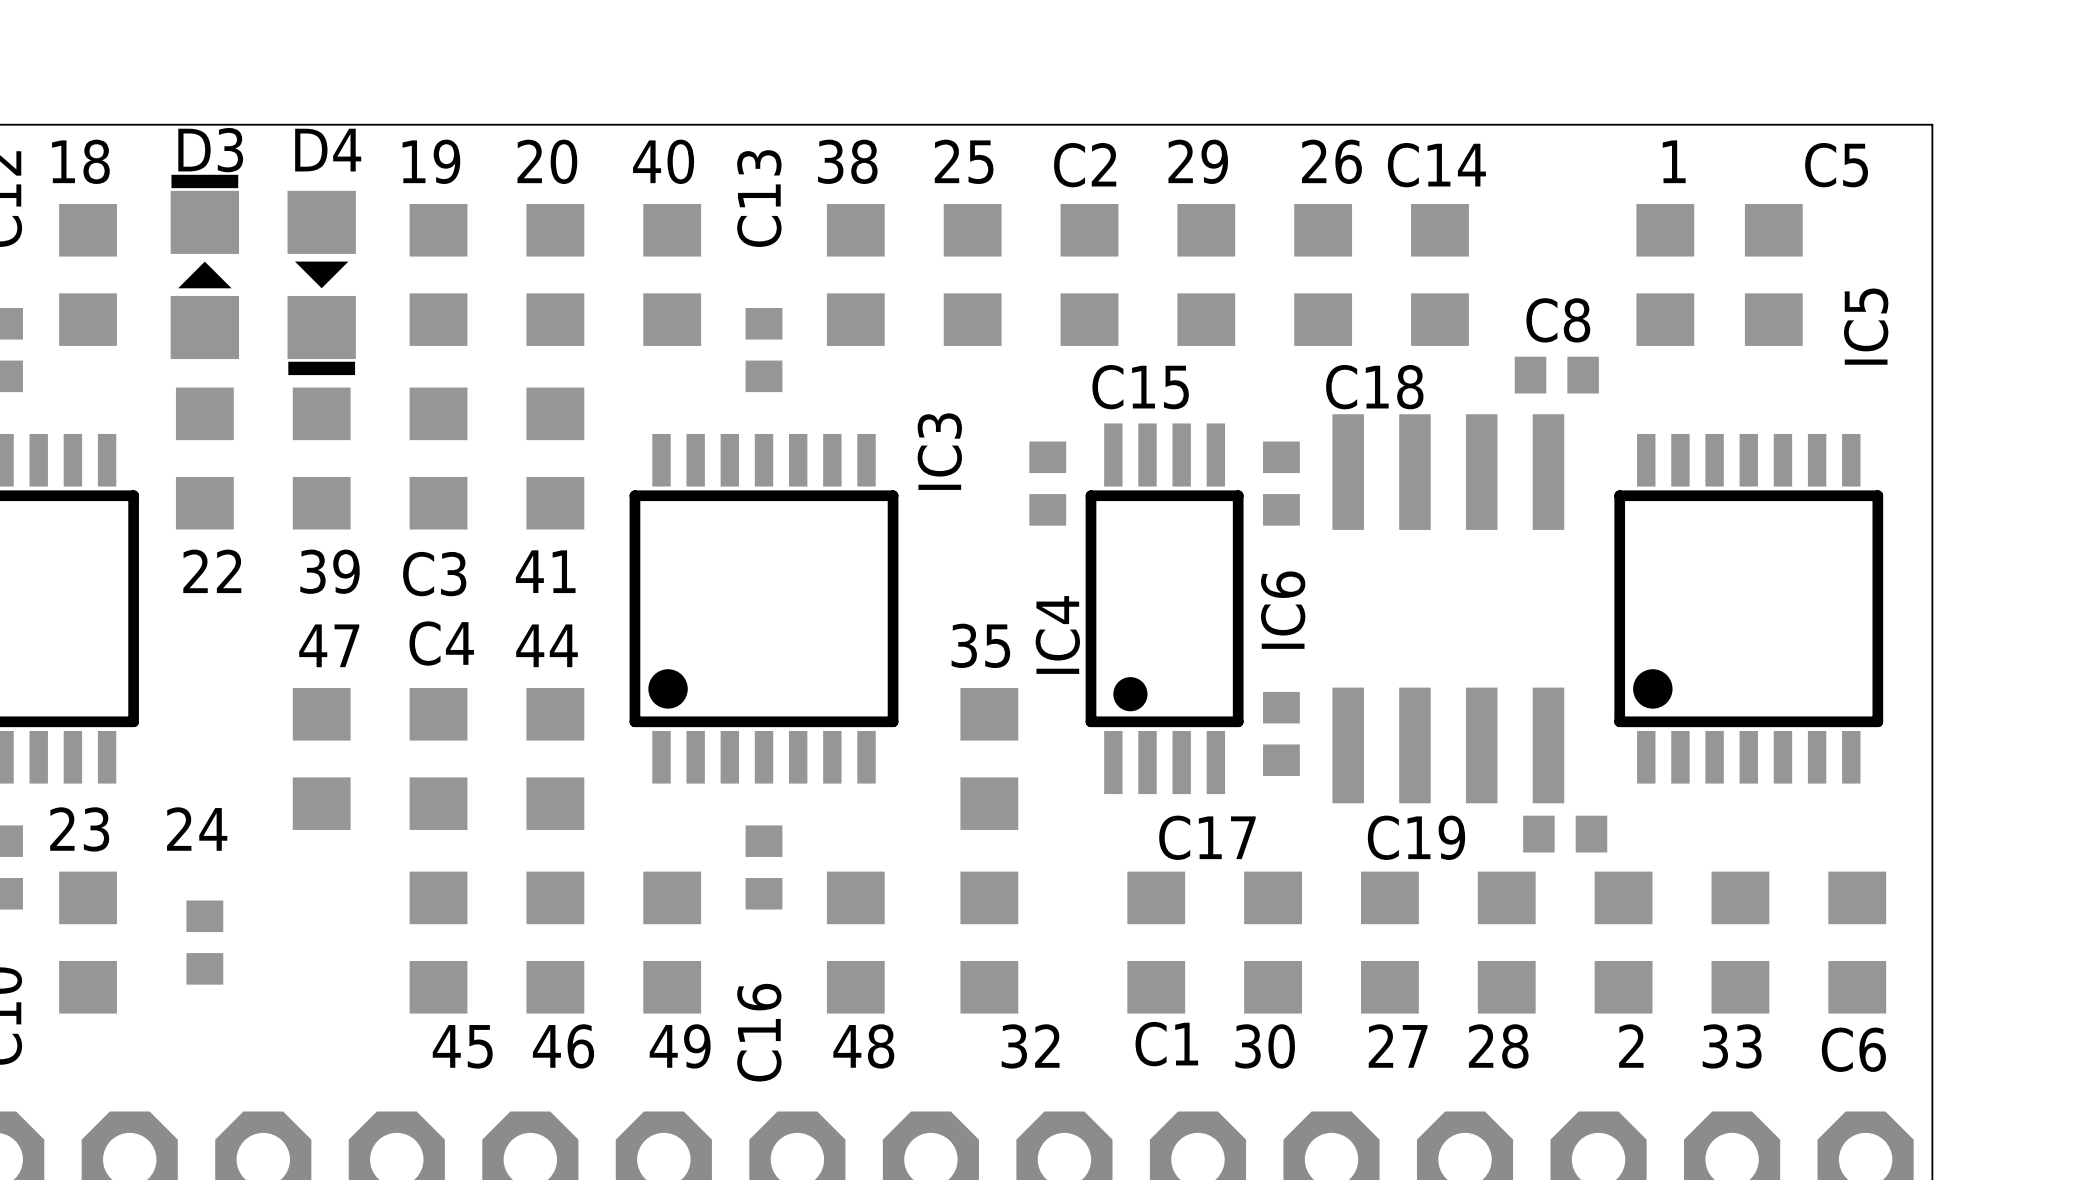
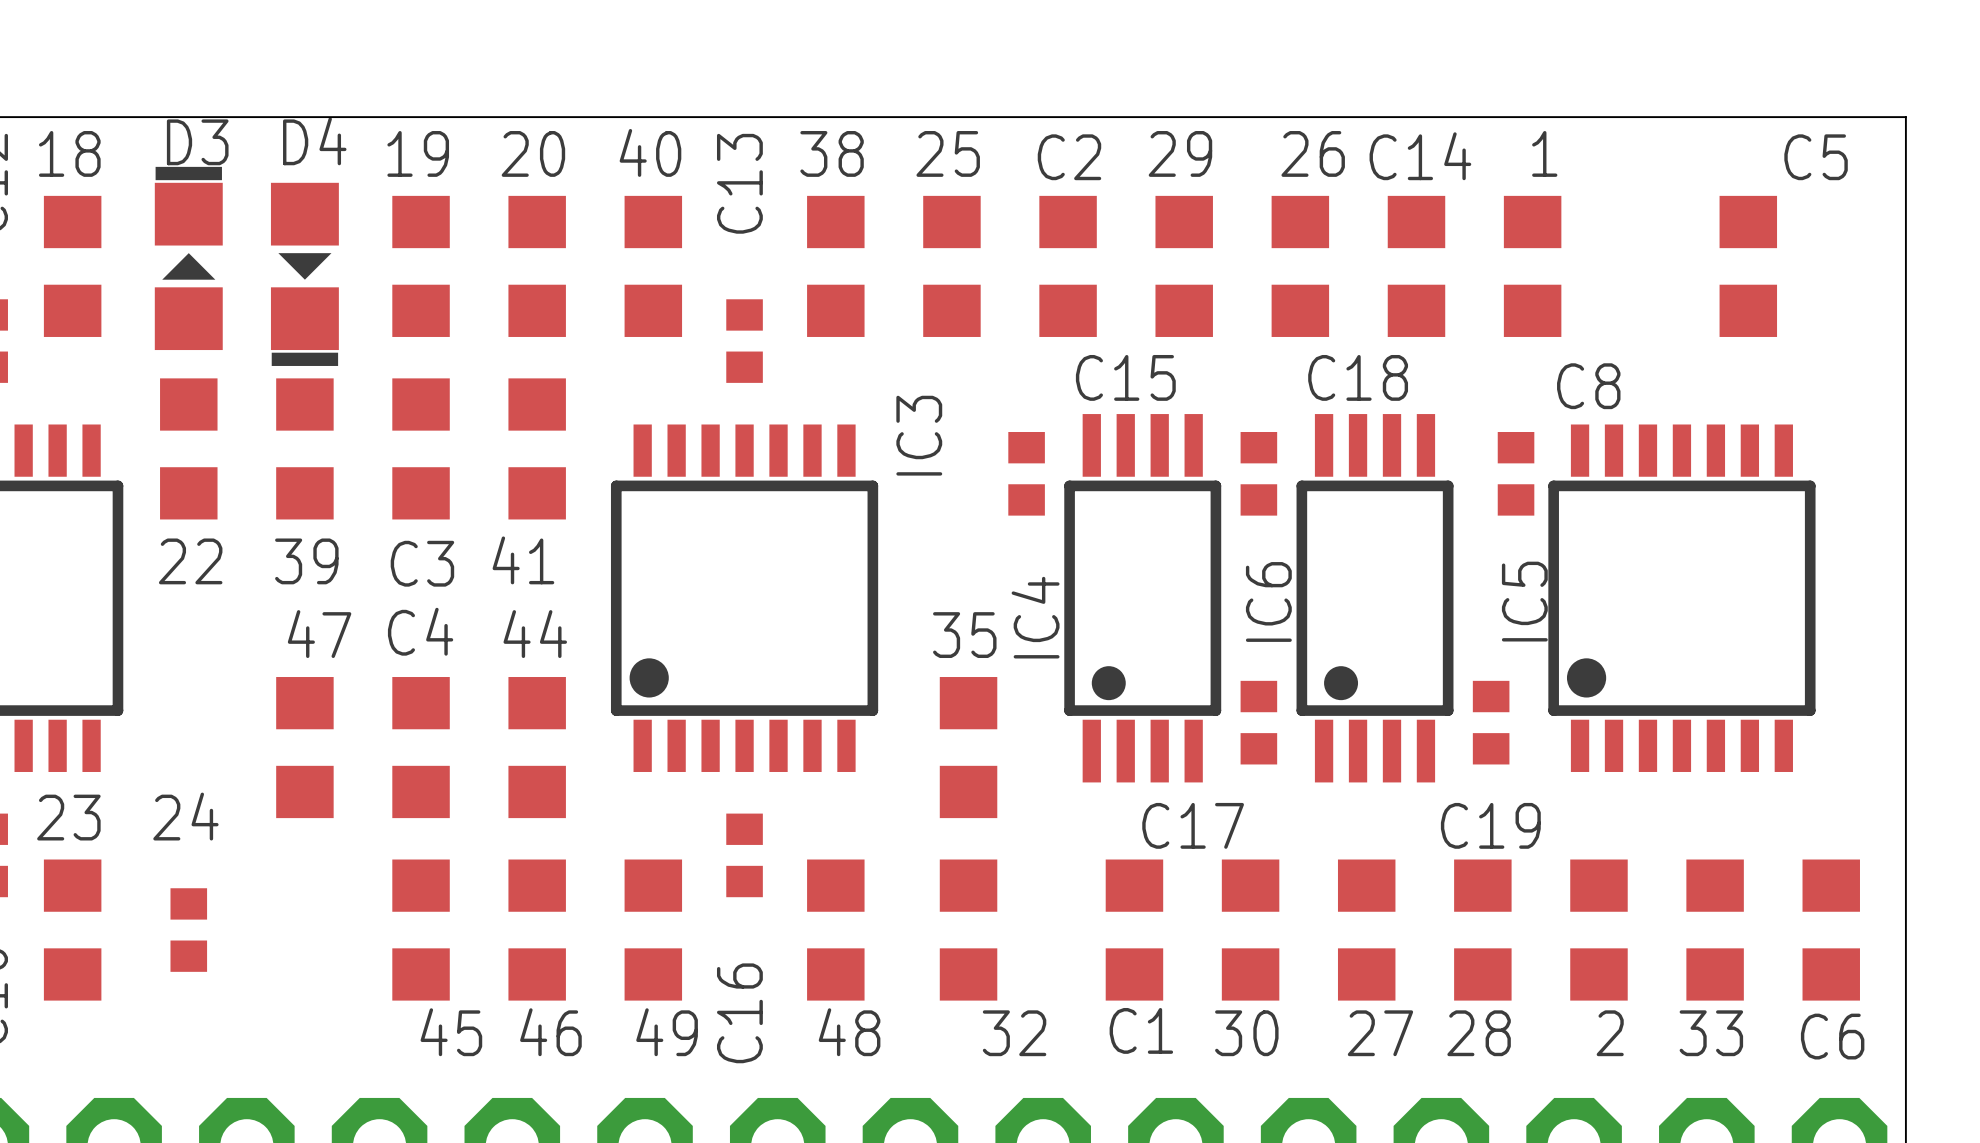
1 position: (1665, 274) -> (1532, 266)
IC5 name position: IC5 (1866, 326) -> IC5 (1524, 601)
C8 rotation: 0° (1556, 375) -> 90° clockwise (1516, 473)
C8 position: (1556, 375) -> (1516, 473)
IC6 footprint: [1332, 414, 1565, 804] -> [1296, 414, 1454, 783]
IC5 position: (1748, 608) -> (1681, 598)
C19 rotation: 0° (1565, 834) -> 90° clockwise (1491, 722)
C19 position: (1565, 834) -> (1491, 722)
C19 name position: C19 (1416, 837) -> C19 (1490, 825)

